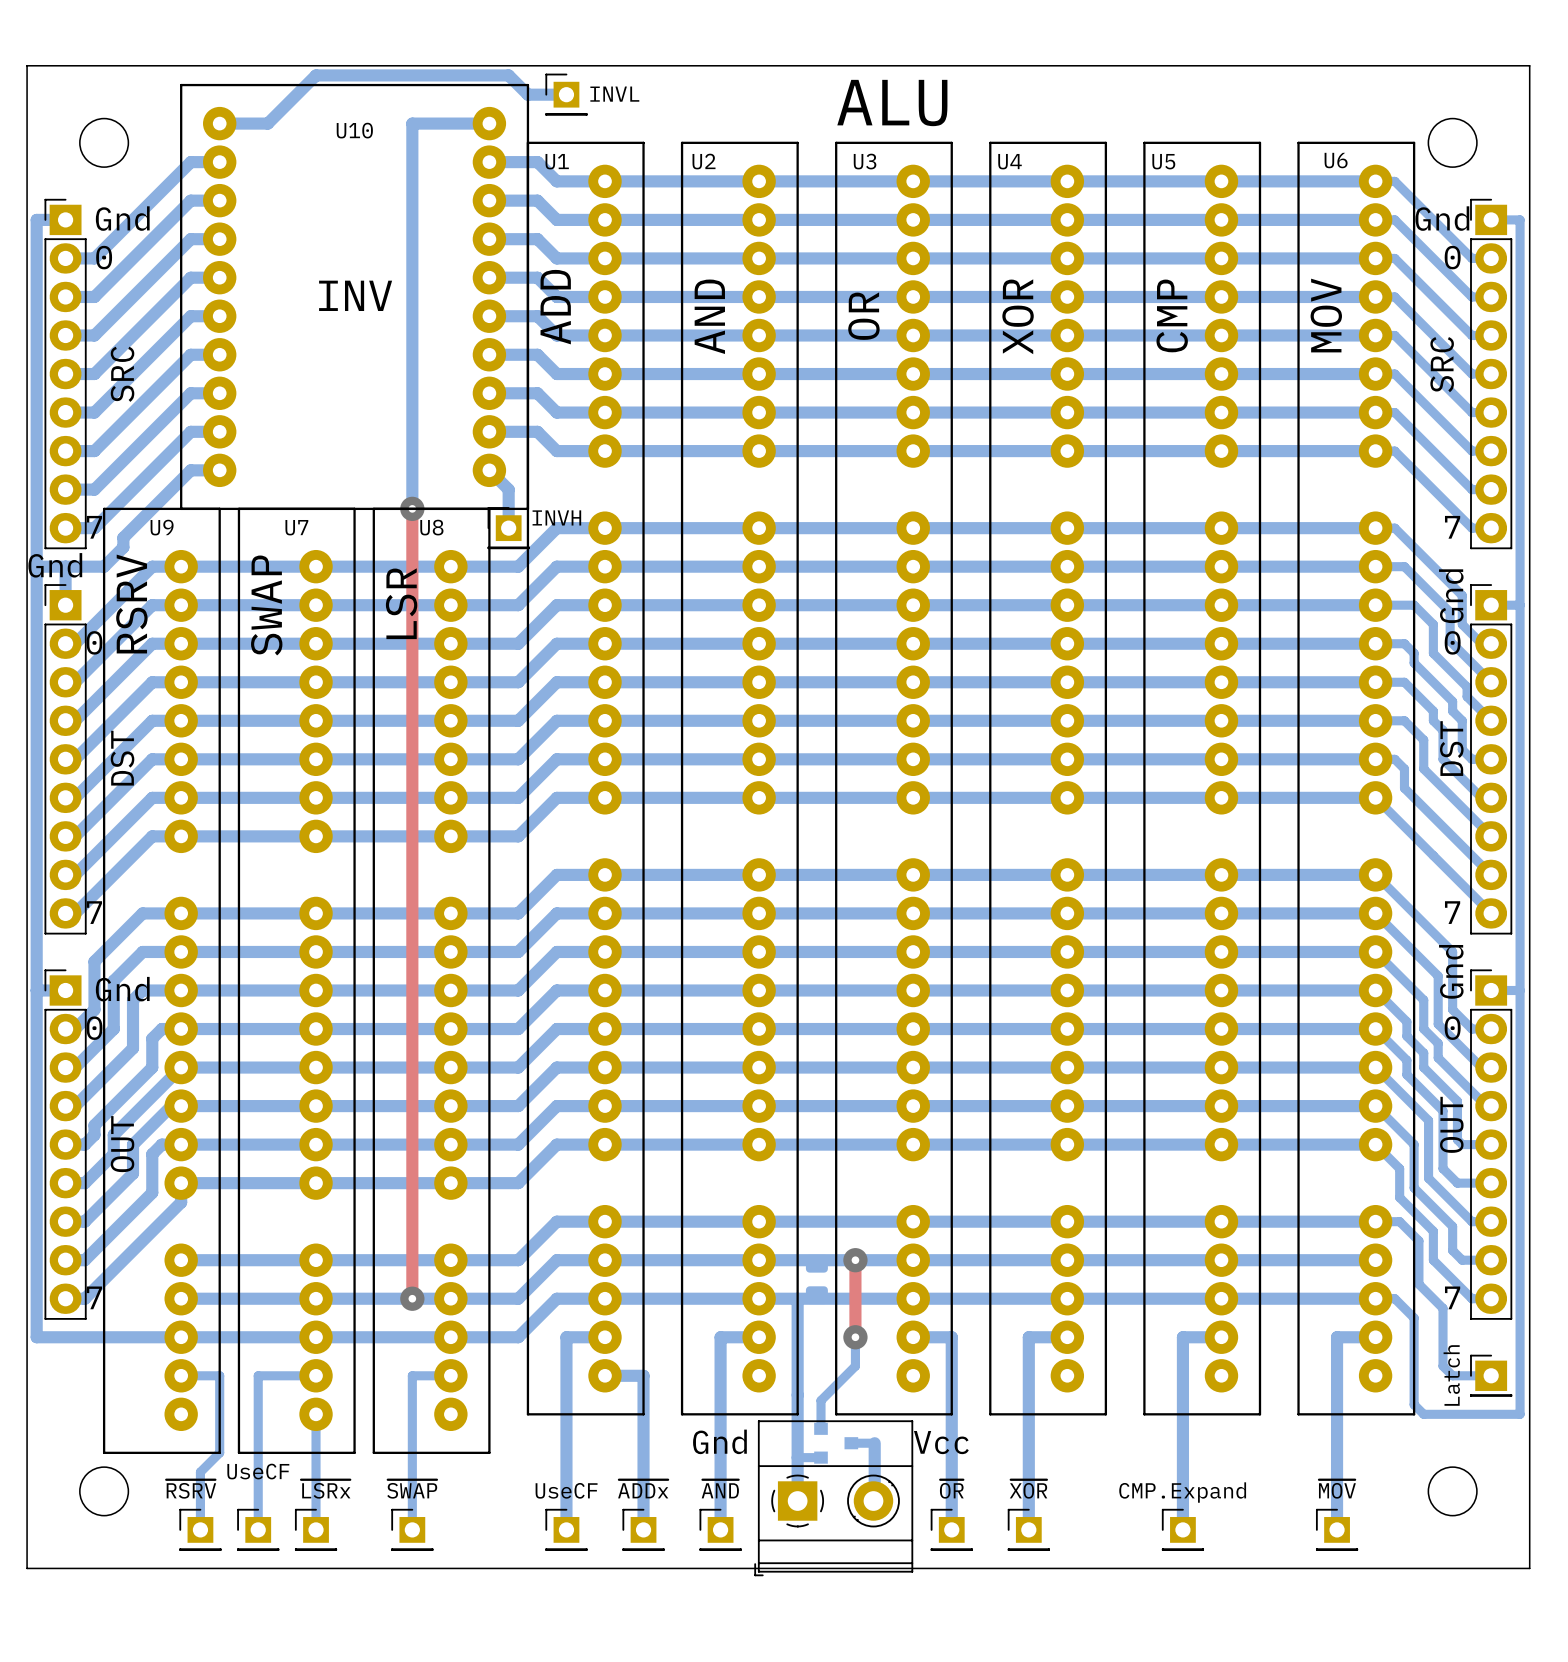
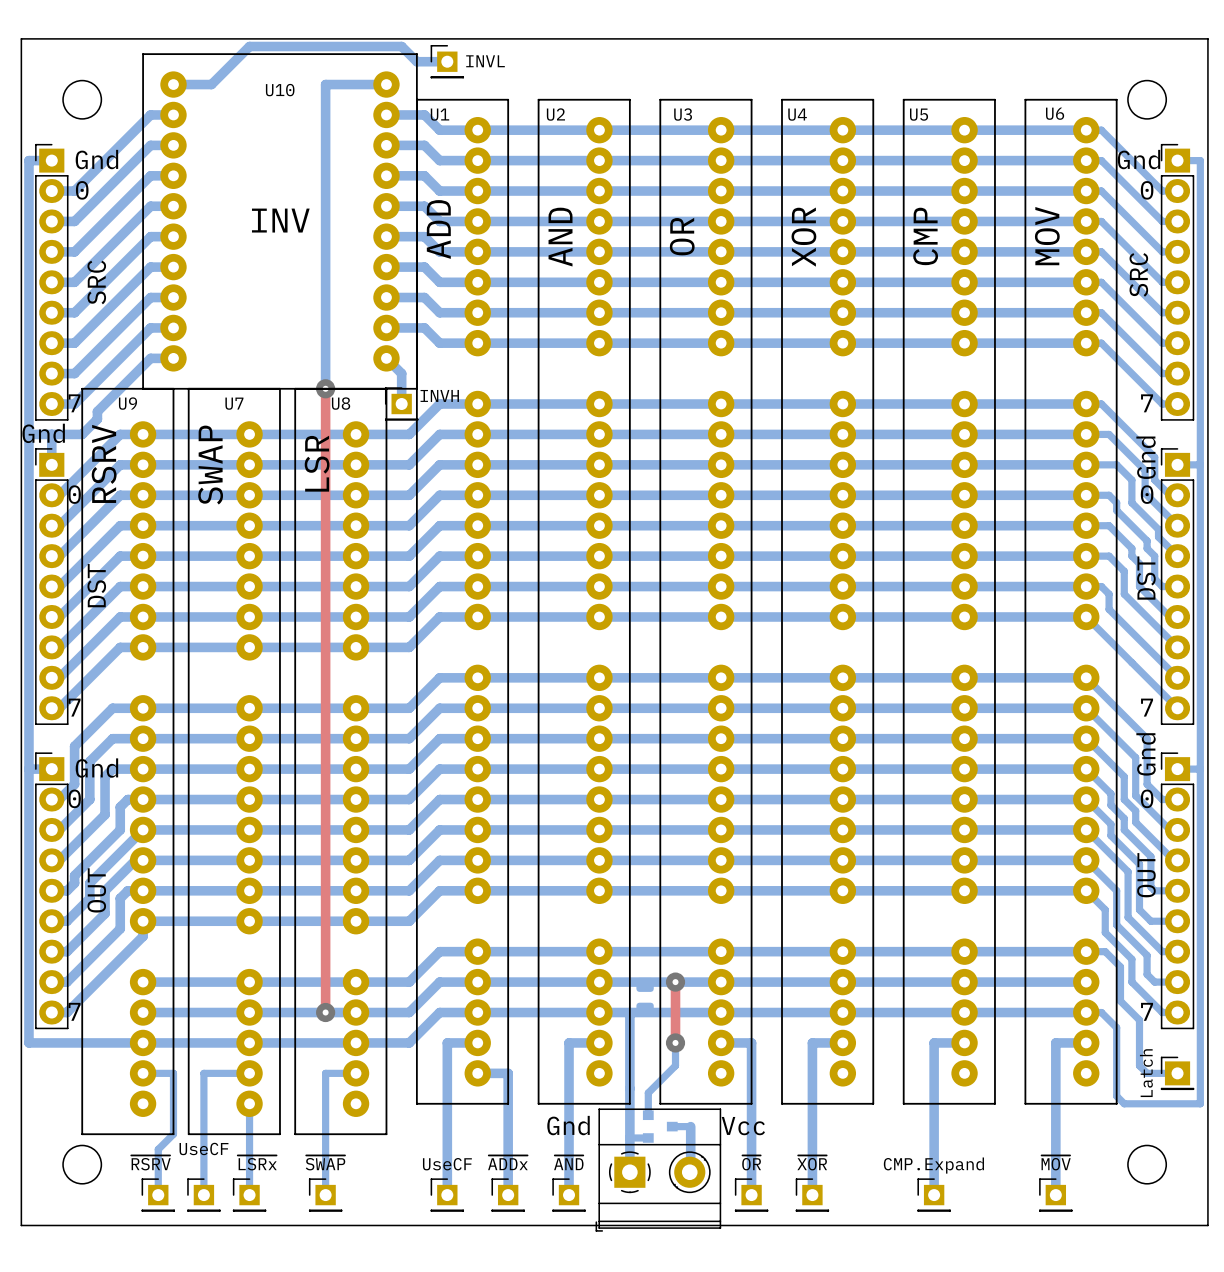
text: ALU (892, 103) -> none

